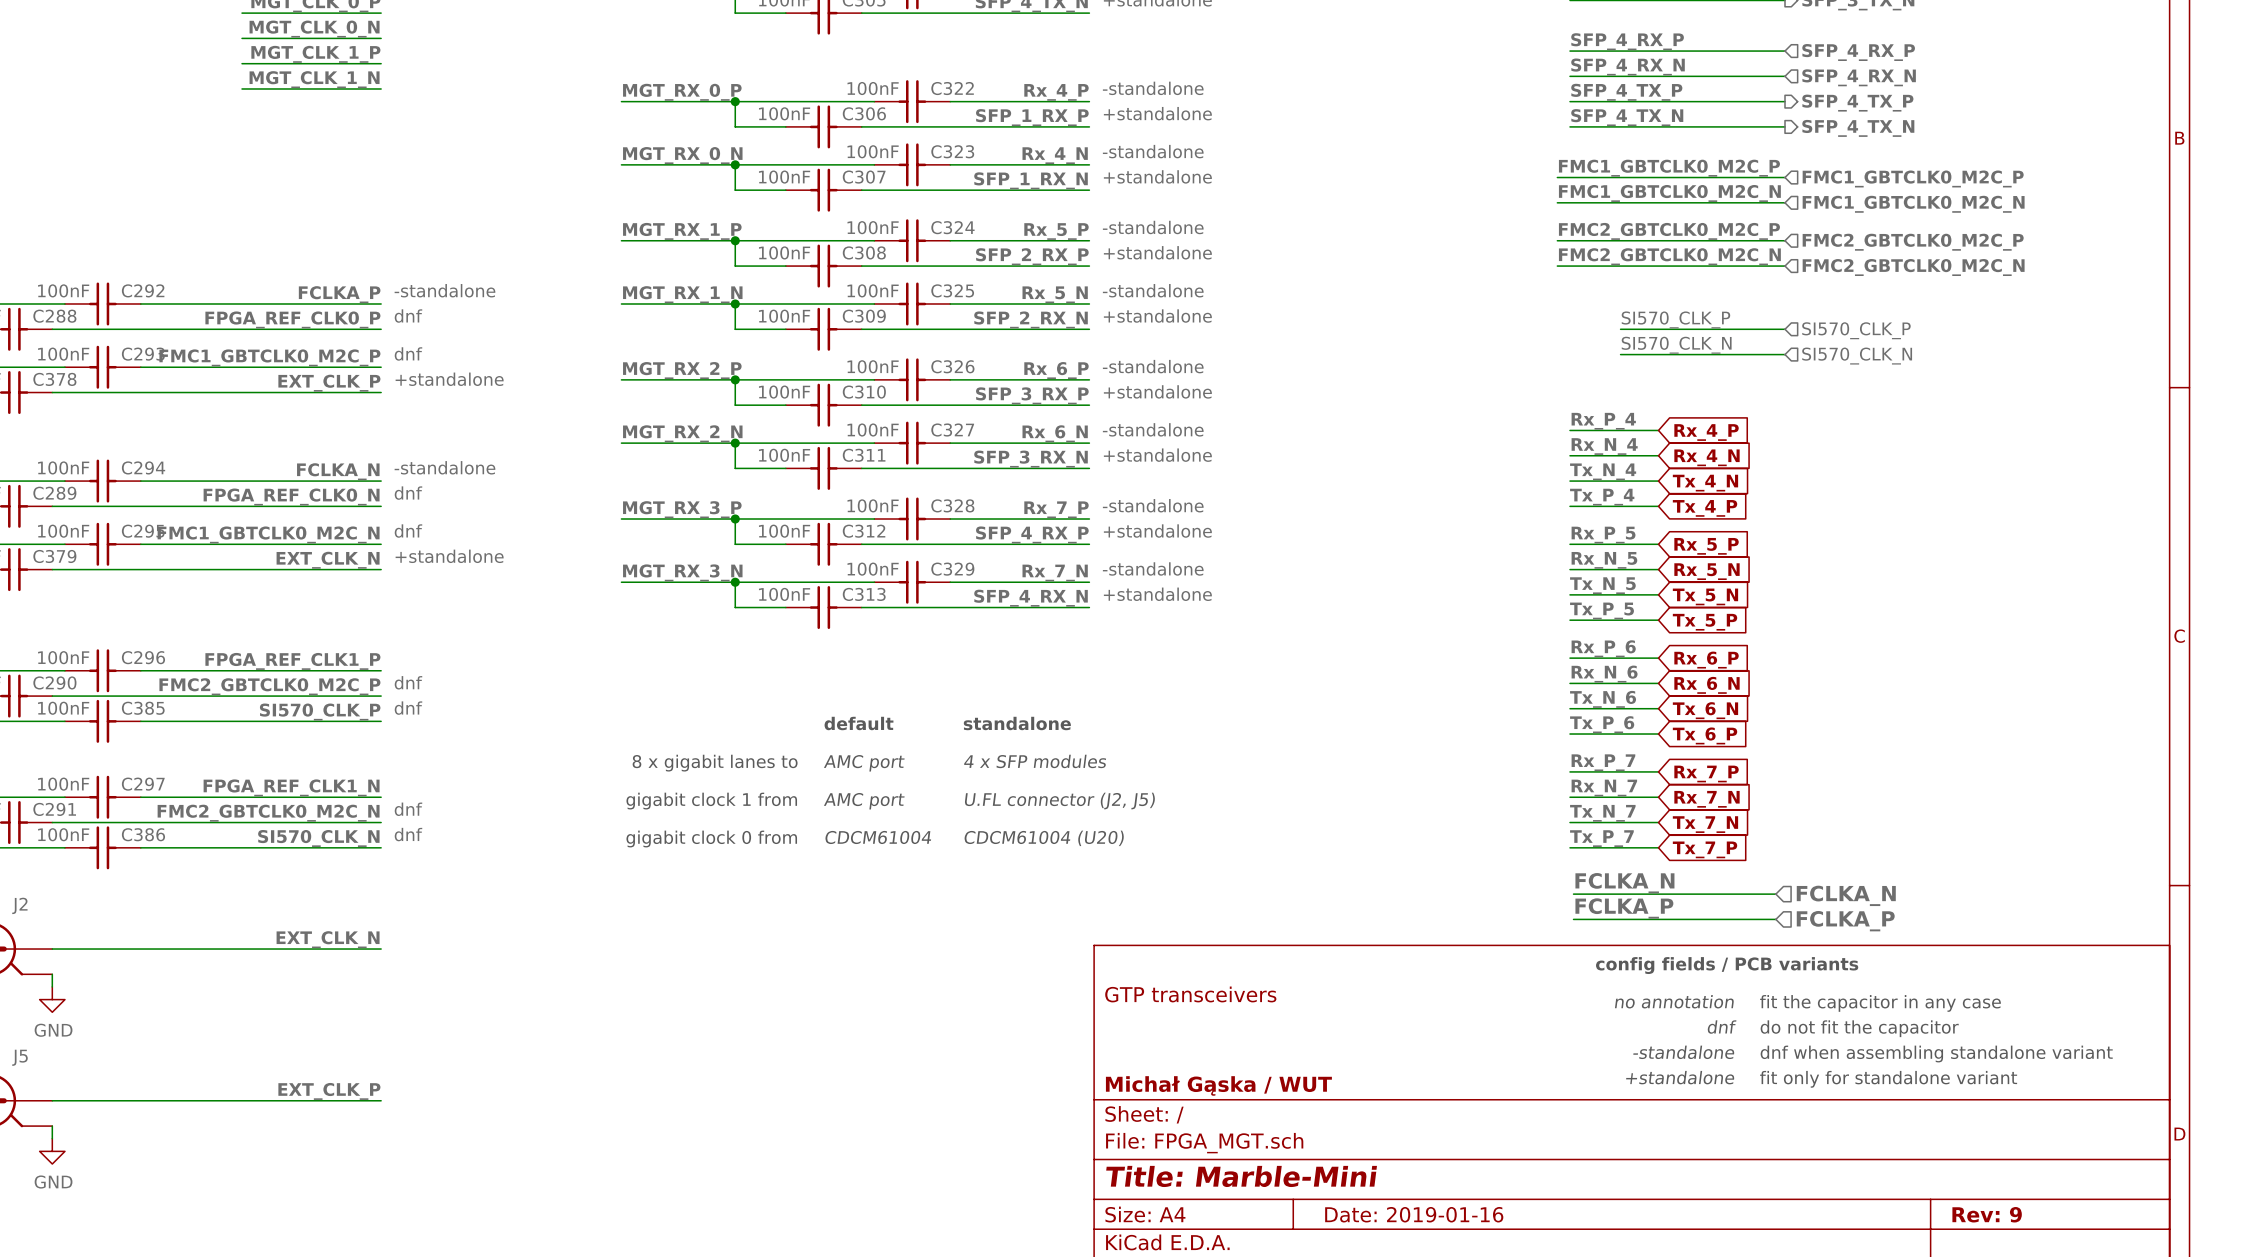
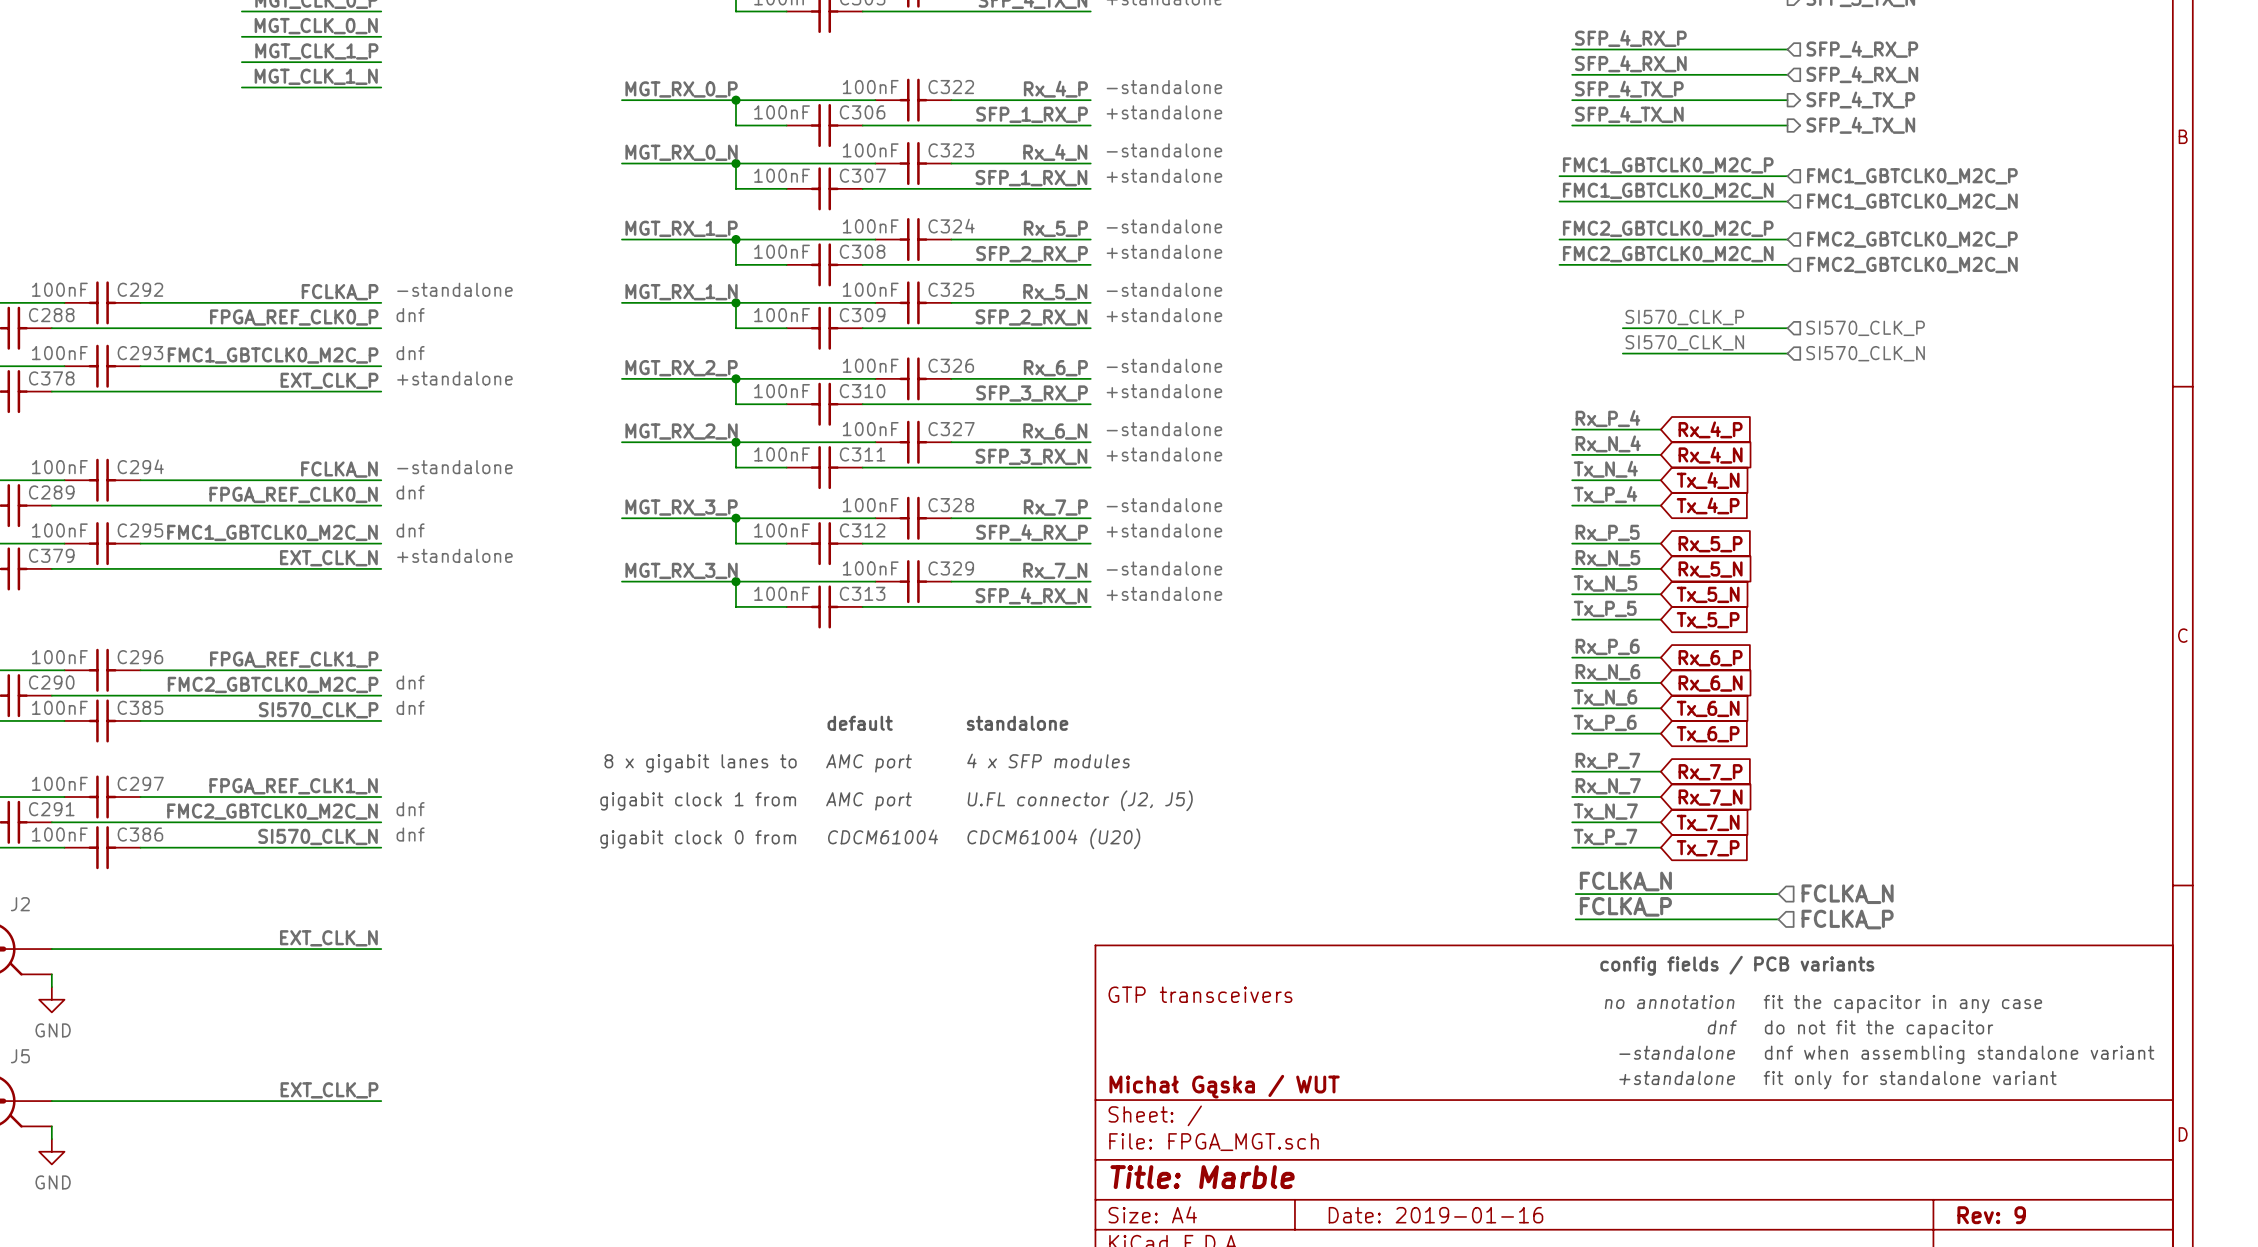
title block: Title: Marble-Mini (1241, 1176) -> Title: Marble (1202, 1177)

